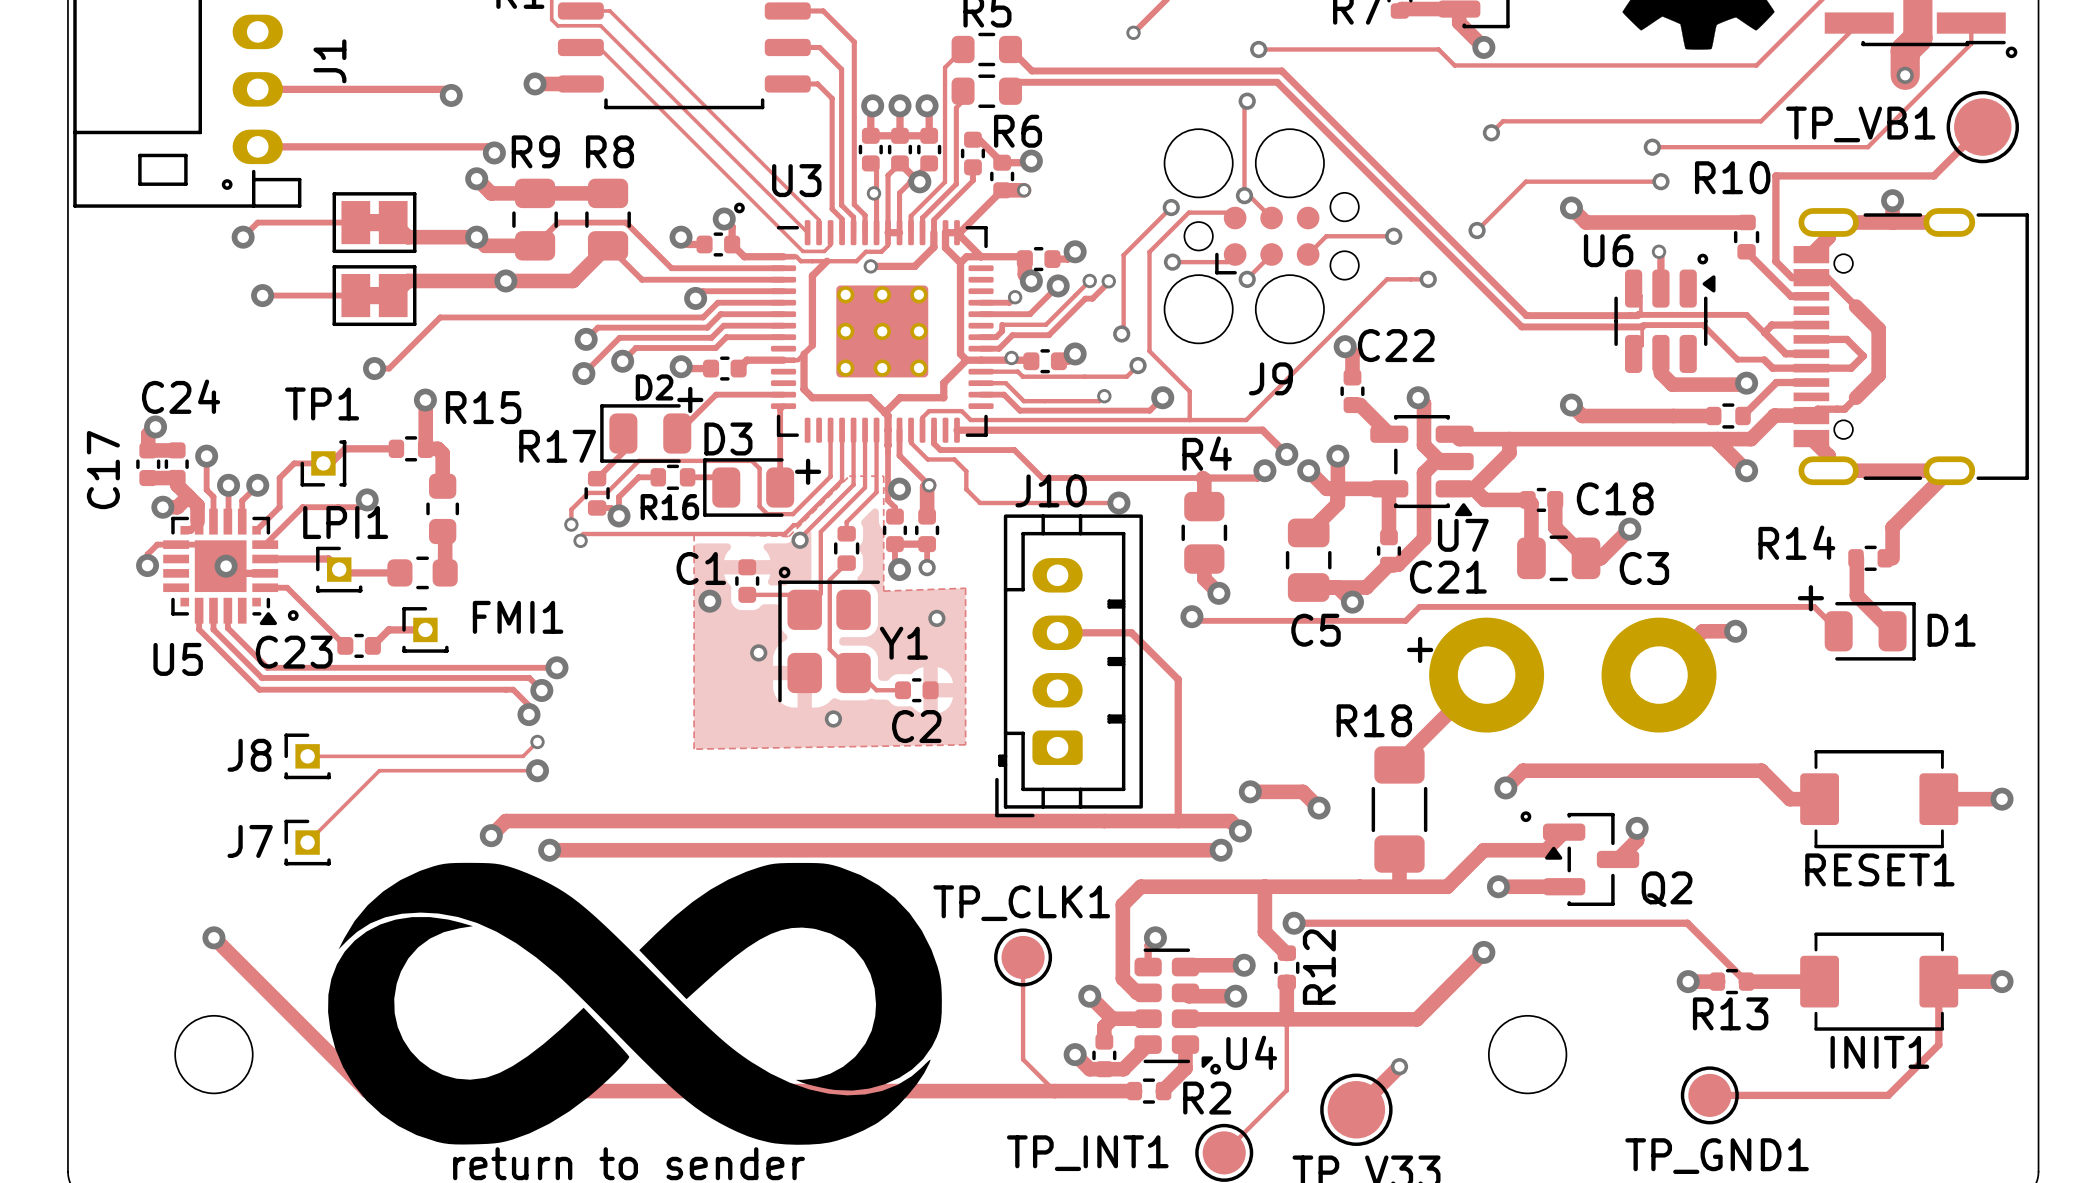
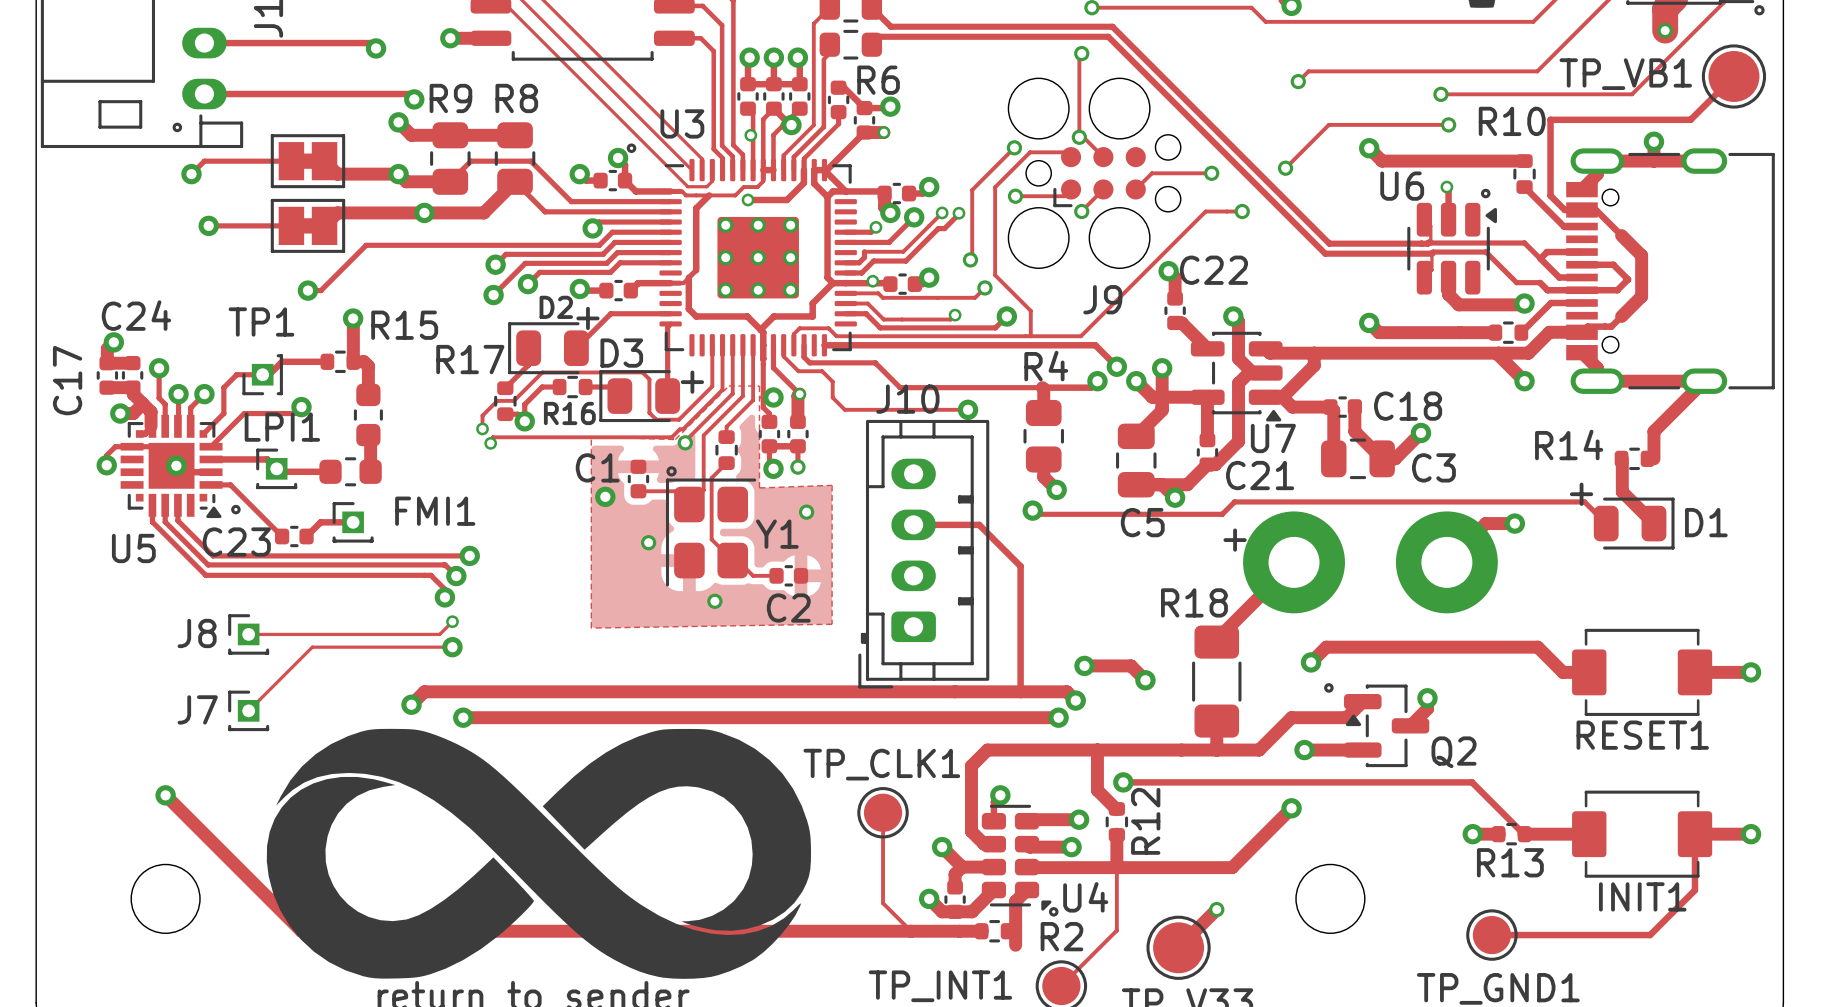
track: (1185, 1044) (1185, 1068) (1162, 1091) -> (1027, 890) (1015, 901) (1015, 945)
R2 name position: R2 (1207, 1098) -> R2 (1061, 936)

